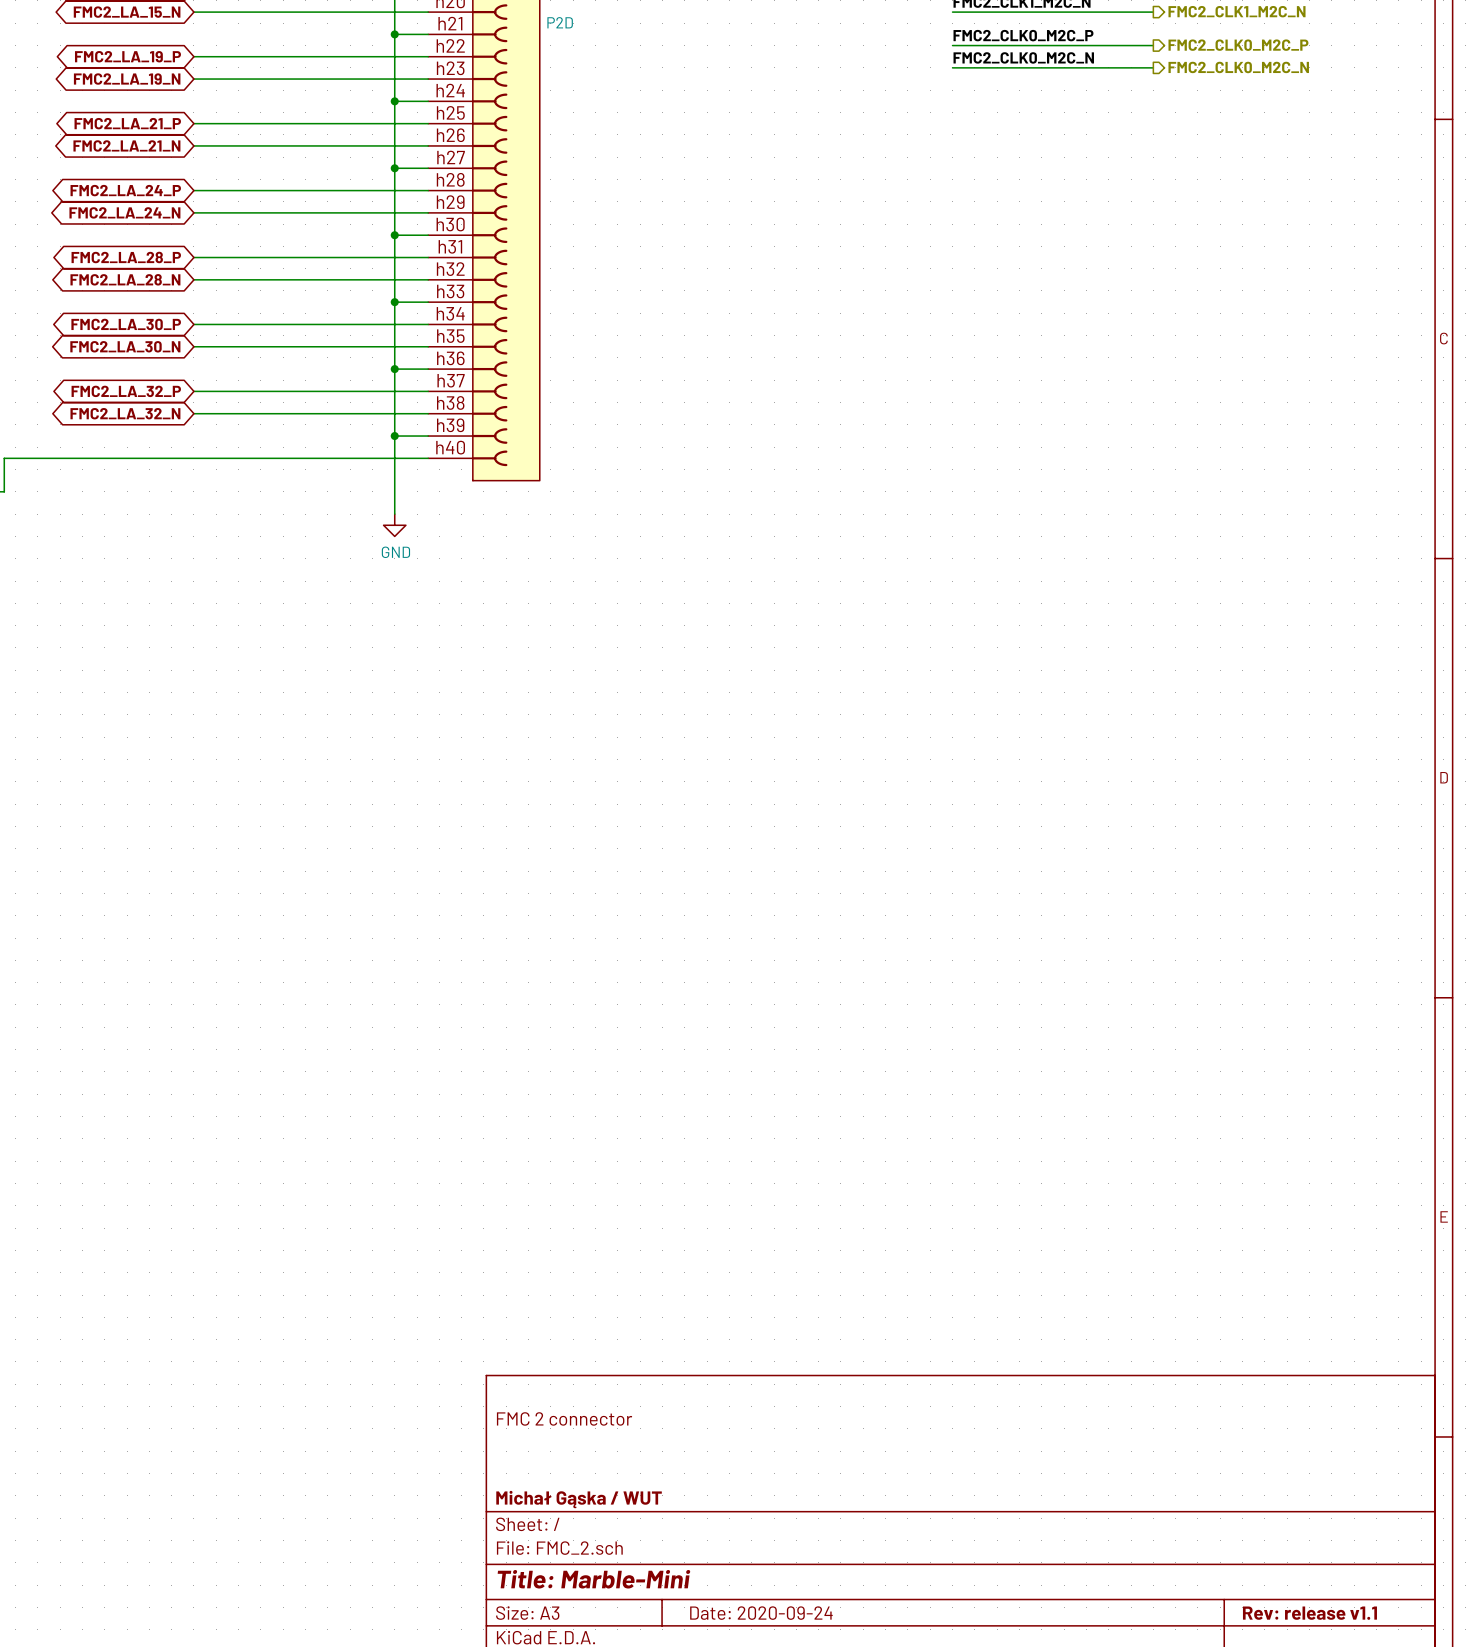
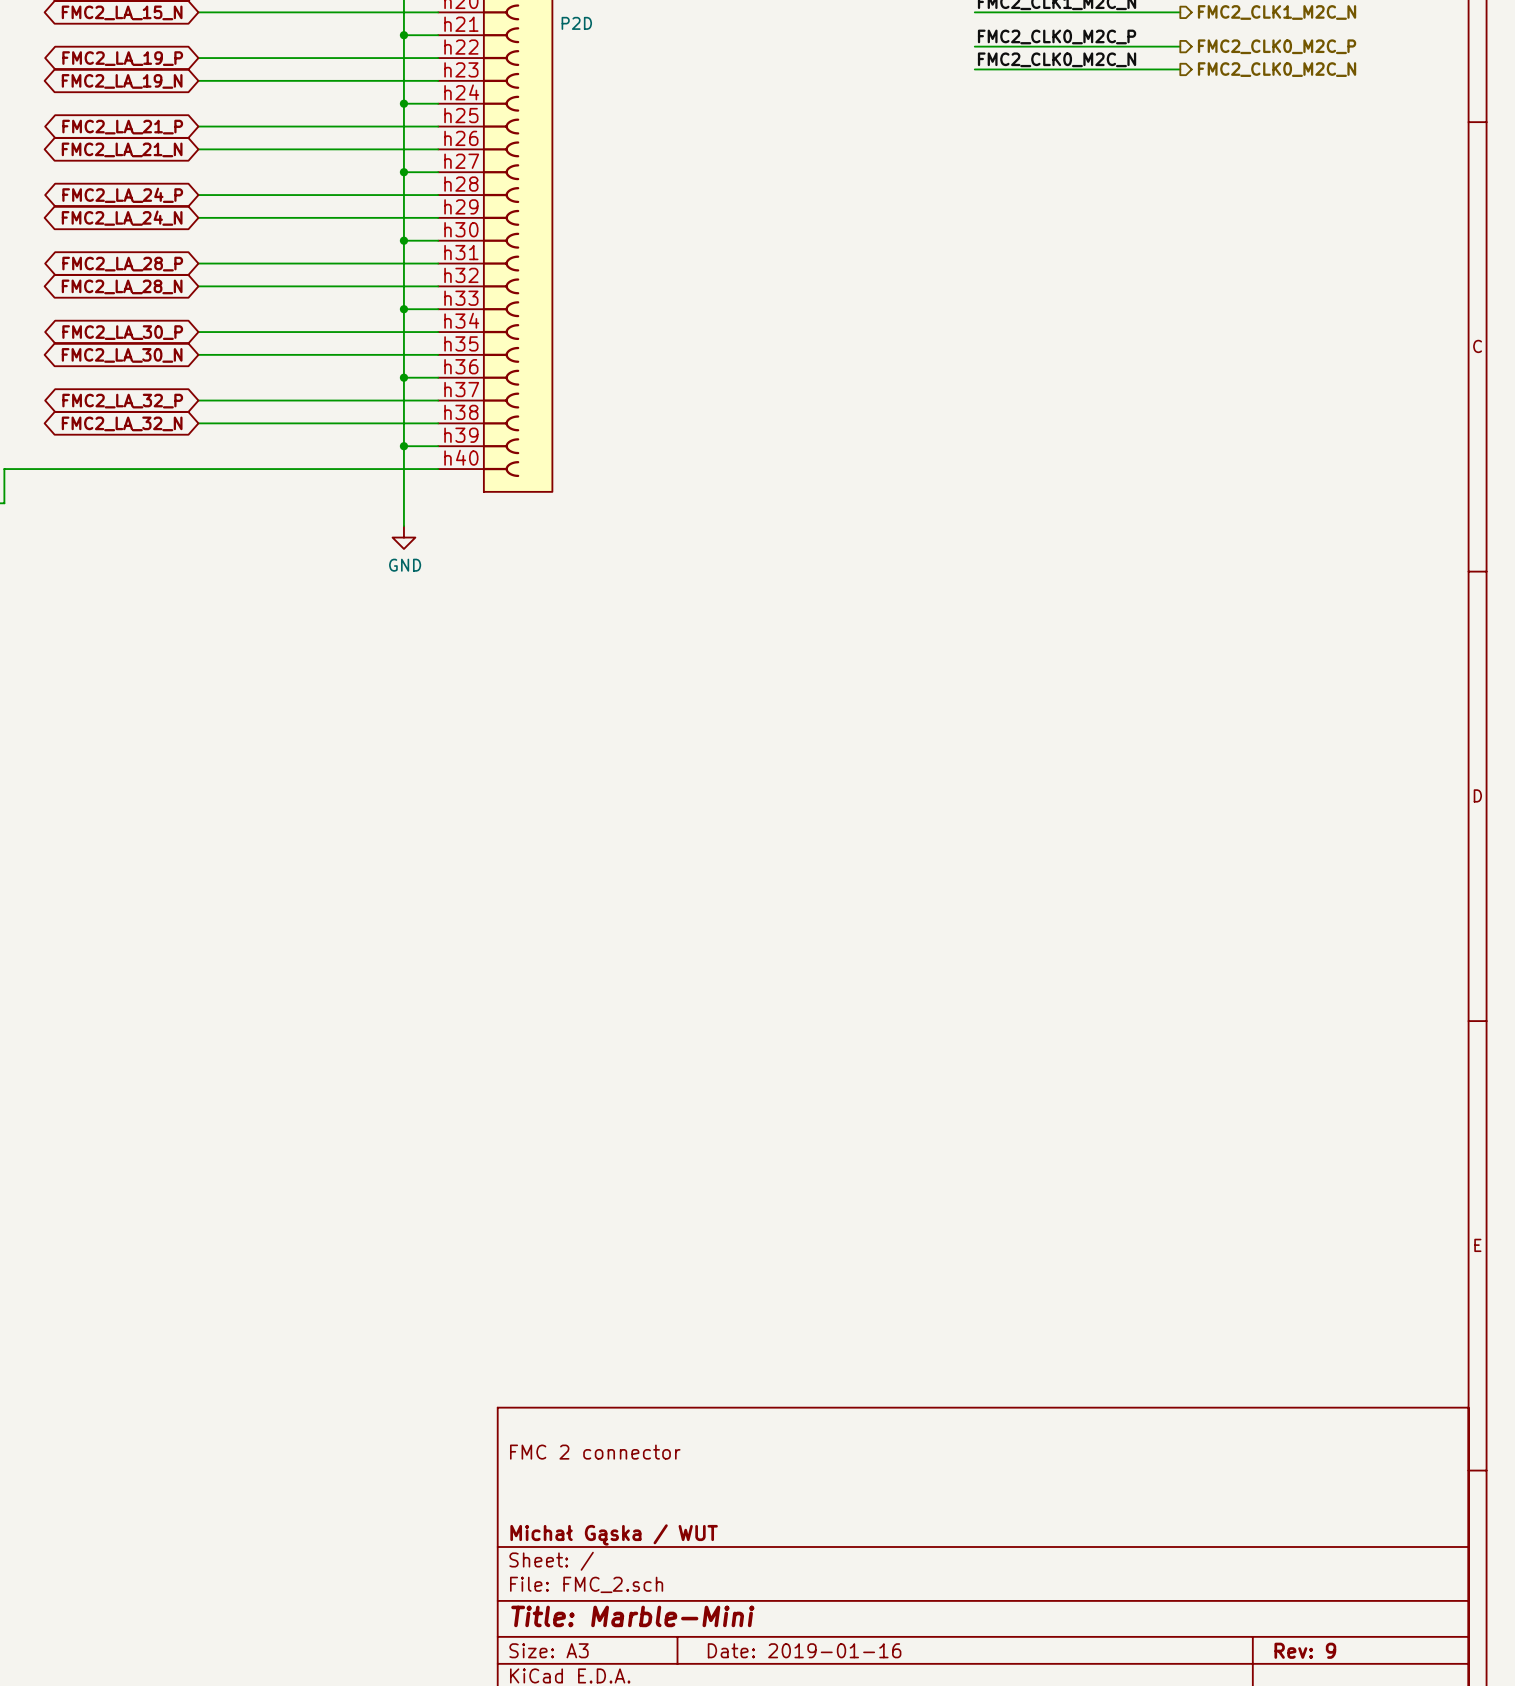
title block: Date: 2020-09-24 (761, 1613) -> Date: 2019-01-16 (804, 1650)
title block: Rev: release v1.1 (1309, 1613) -> Rev: 9 (1305, 1650)

